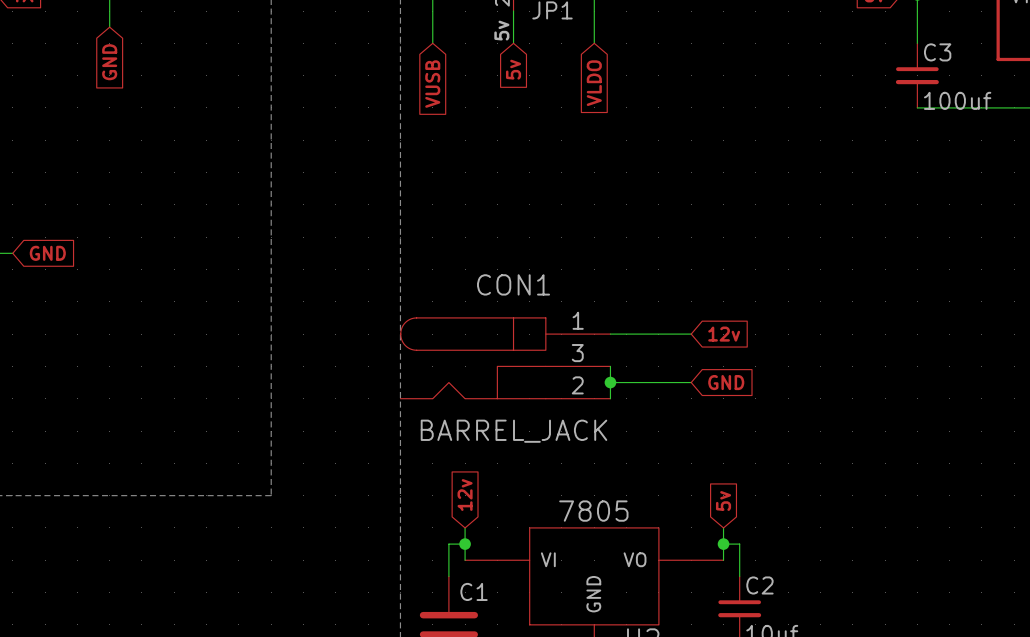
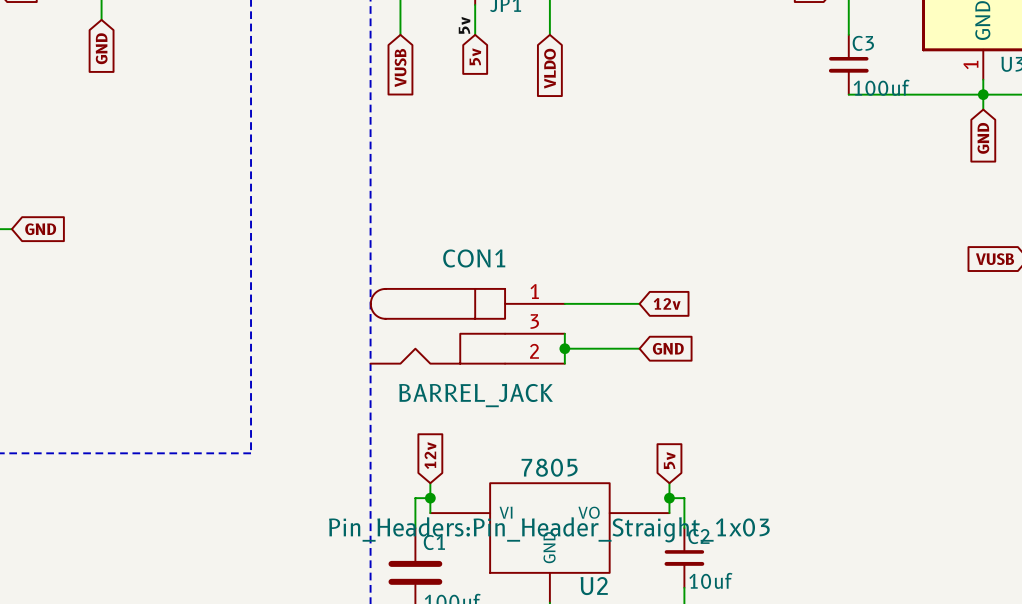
U2 text: none -> Pin_Headers:Pin_Header_Straight_1x03 (549, 529)

